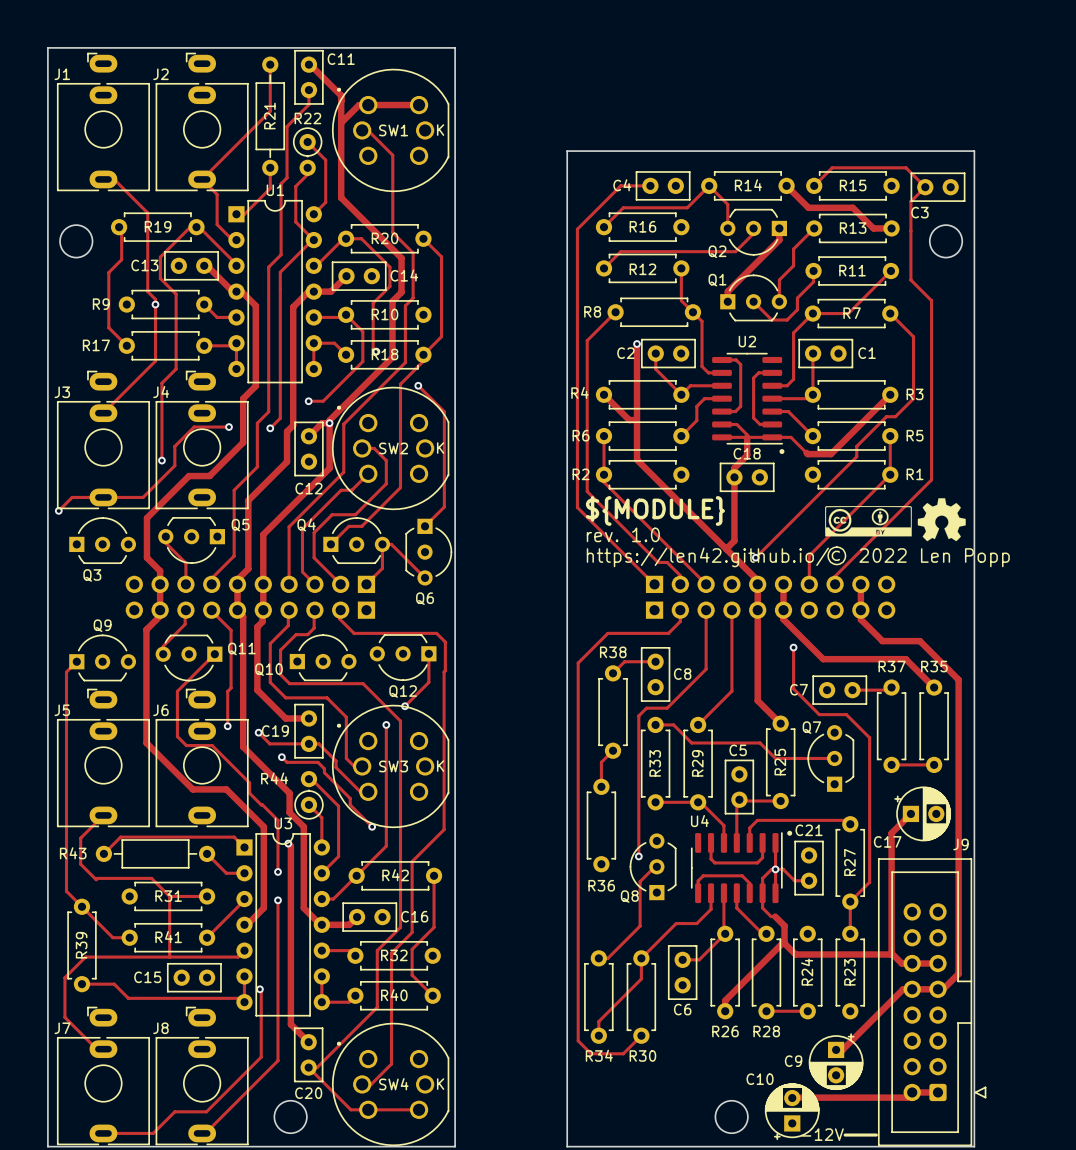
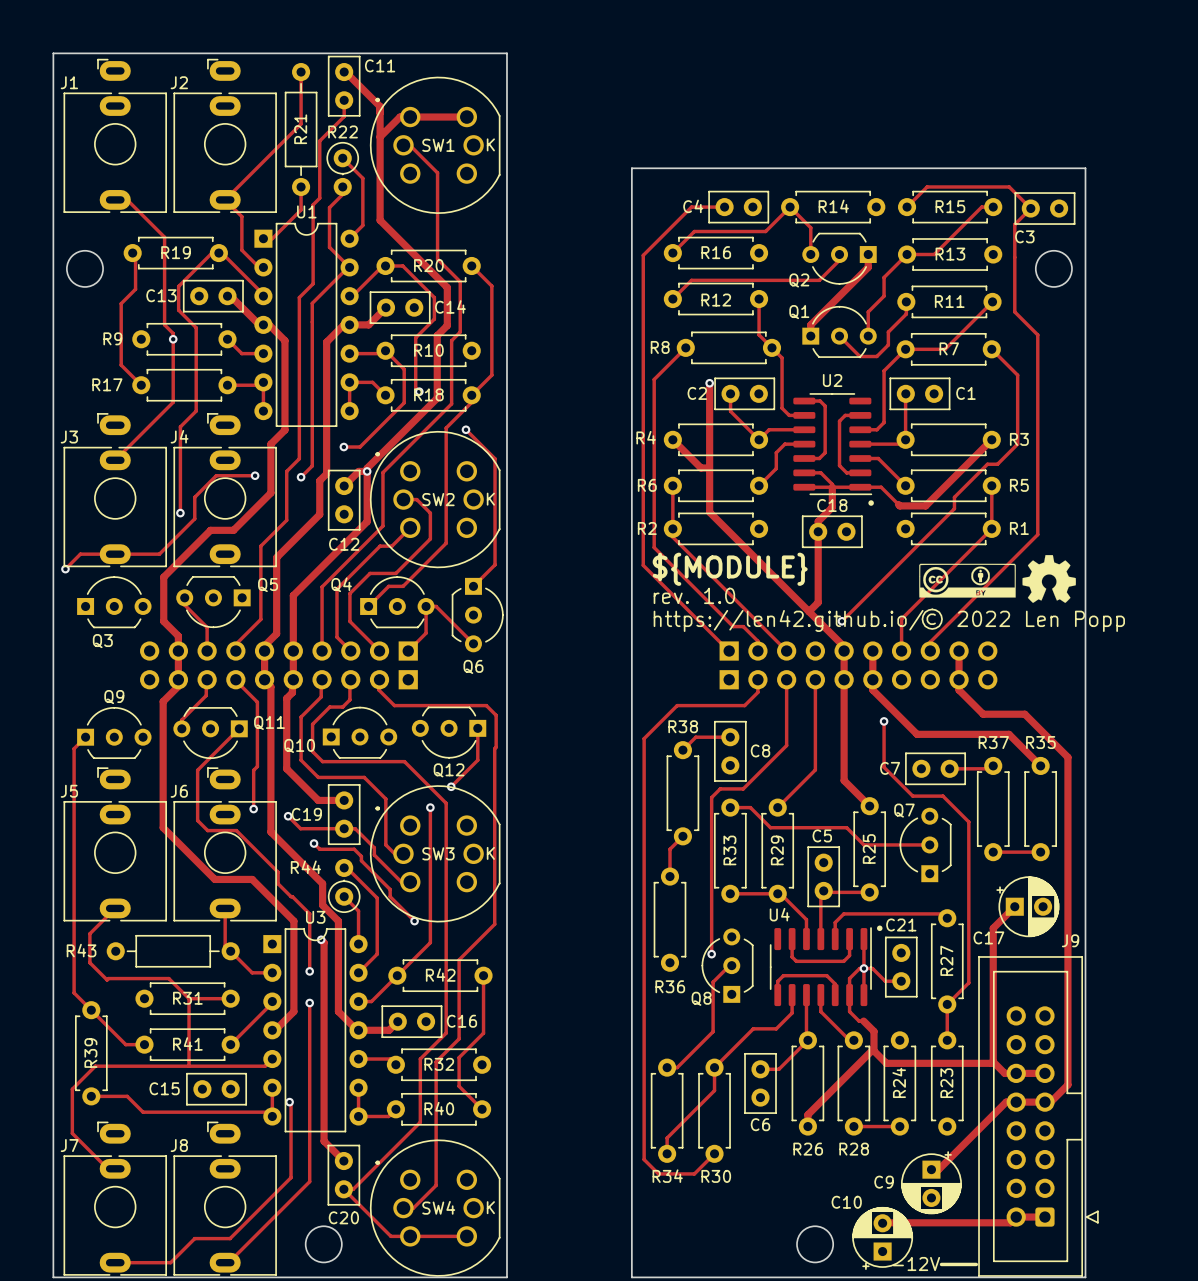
track: (786, 185) (808, 207) (852, 207) (873, 228) (891, 228) -> none
track: none -> (993, 207) (981, 207) (934, 254) (907, 254)
track: none -> (225, 908) (225, 945) (230, 951)
track: (244, 847) (234, 837) (120, 837) (103, 853) -> none

